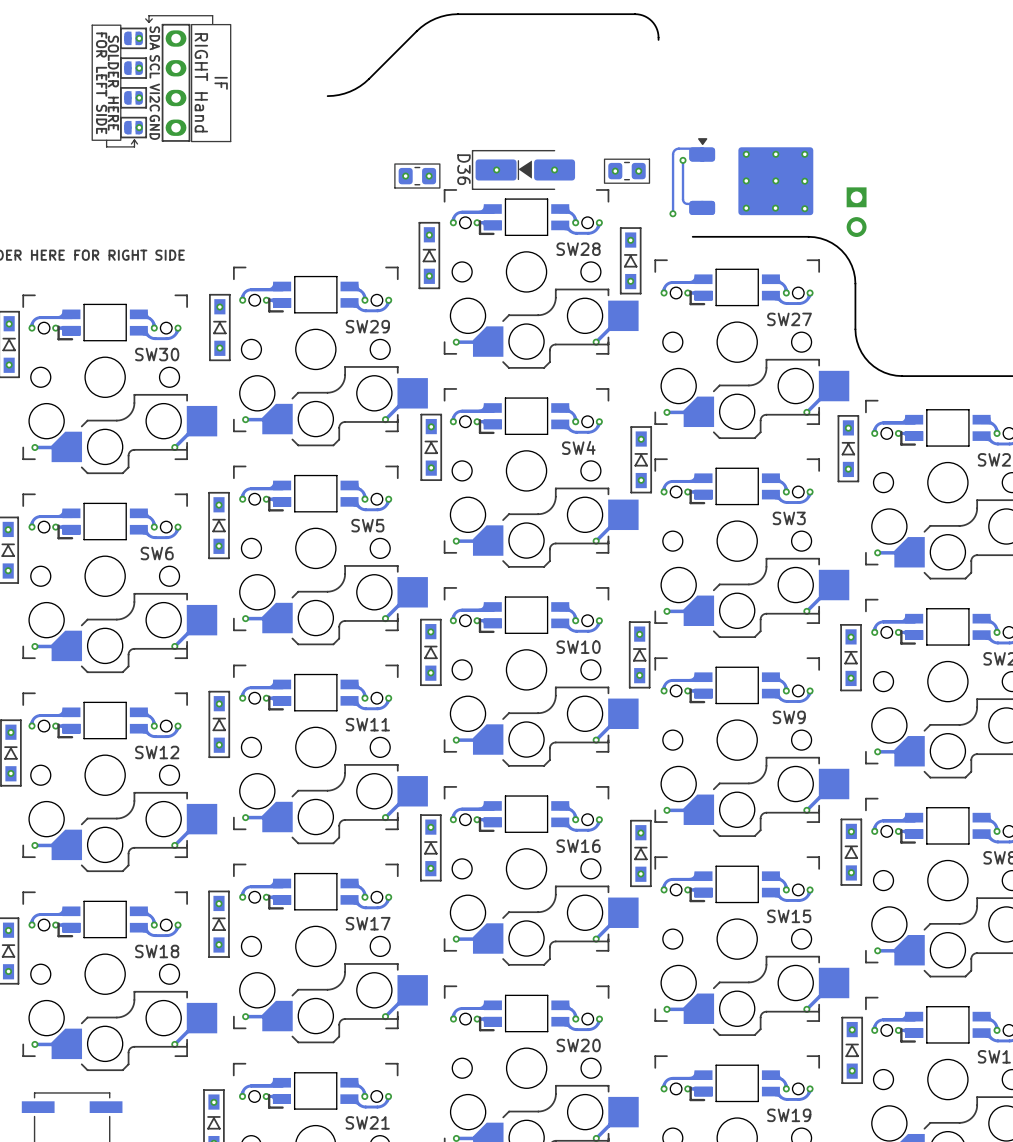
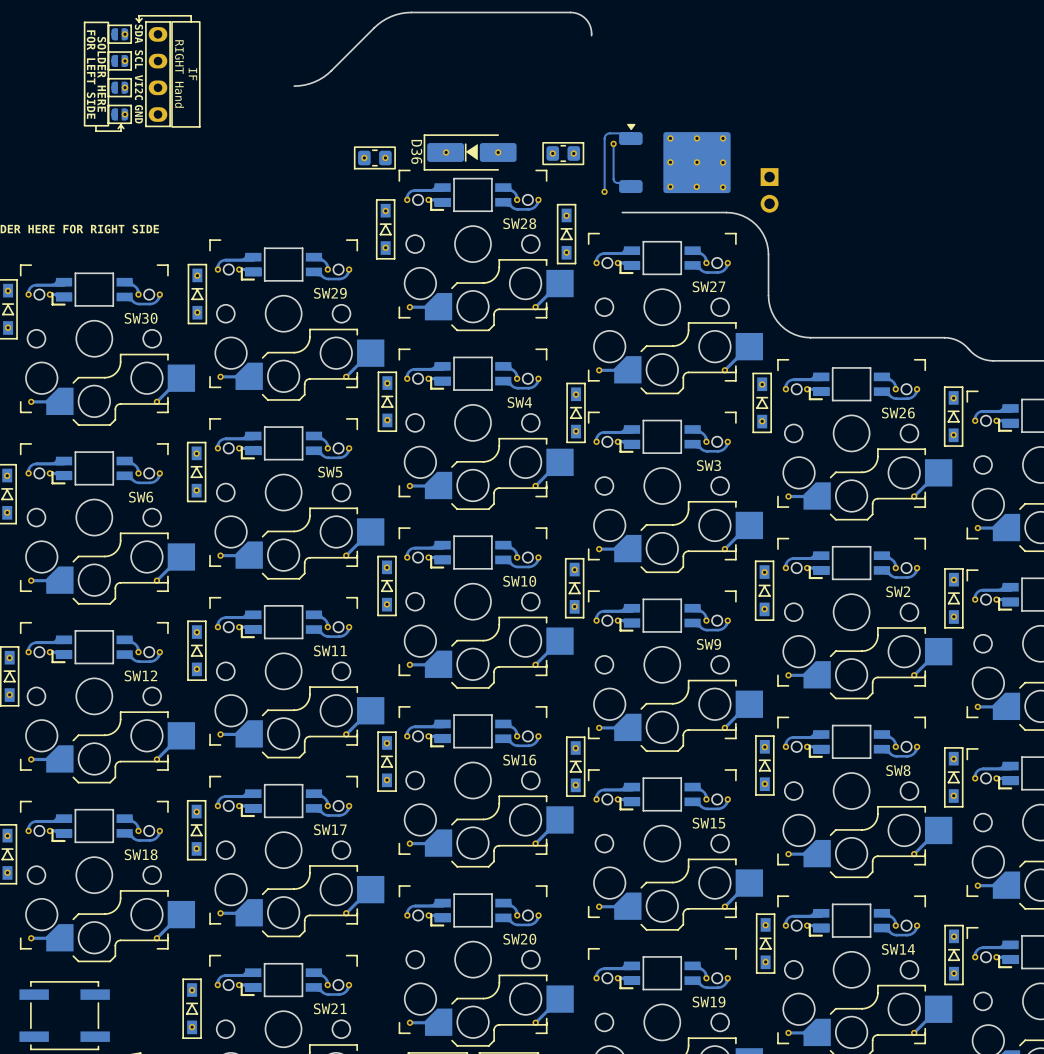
part footprint: [145, 15, 232, 143] -> [135, 15, 201, 128]
part footprint: [91, 24, 148, 148] -> [84, 21, 132, 132]

